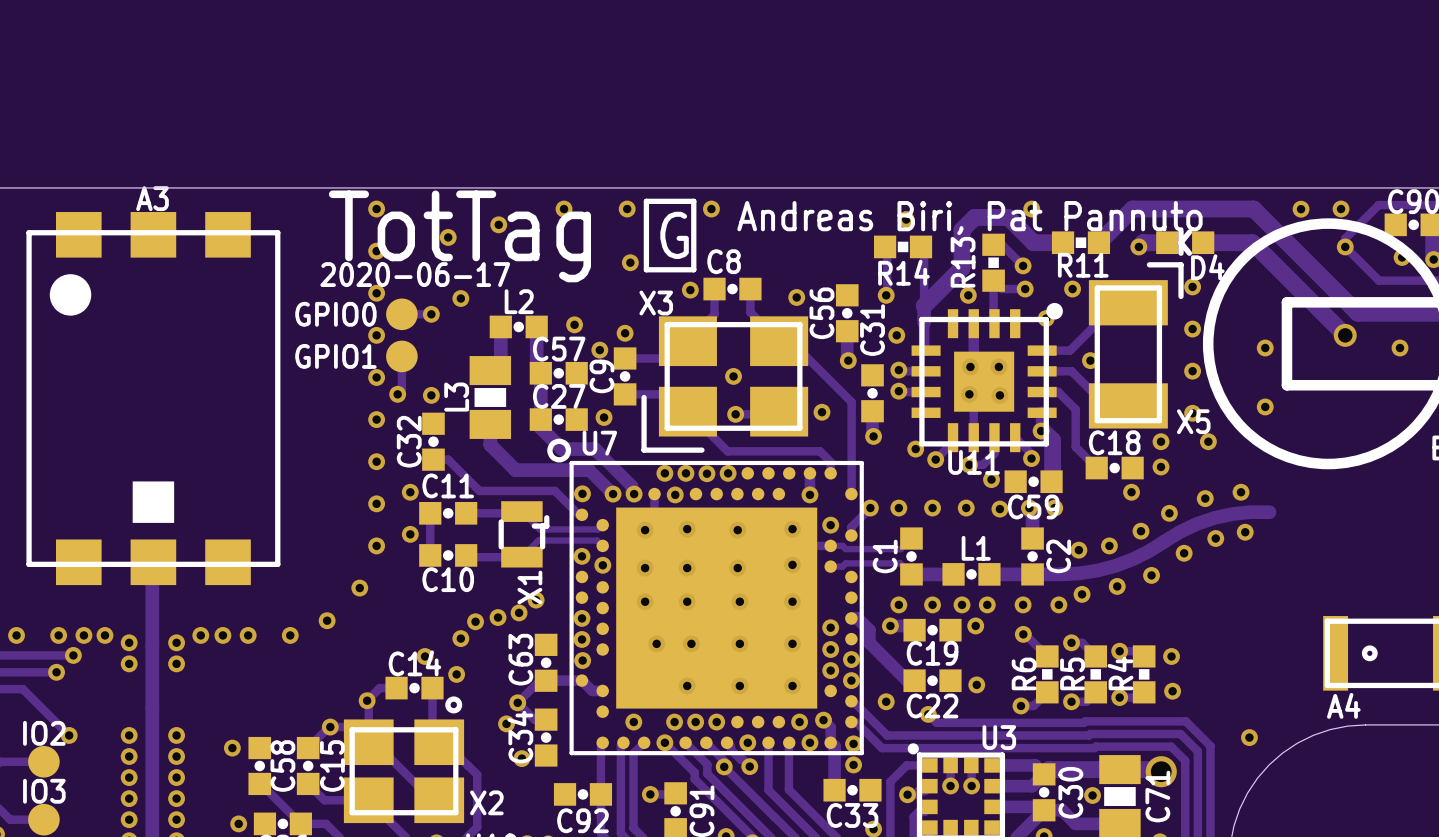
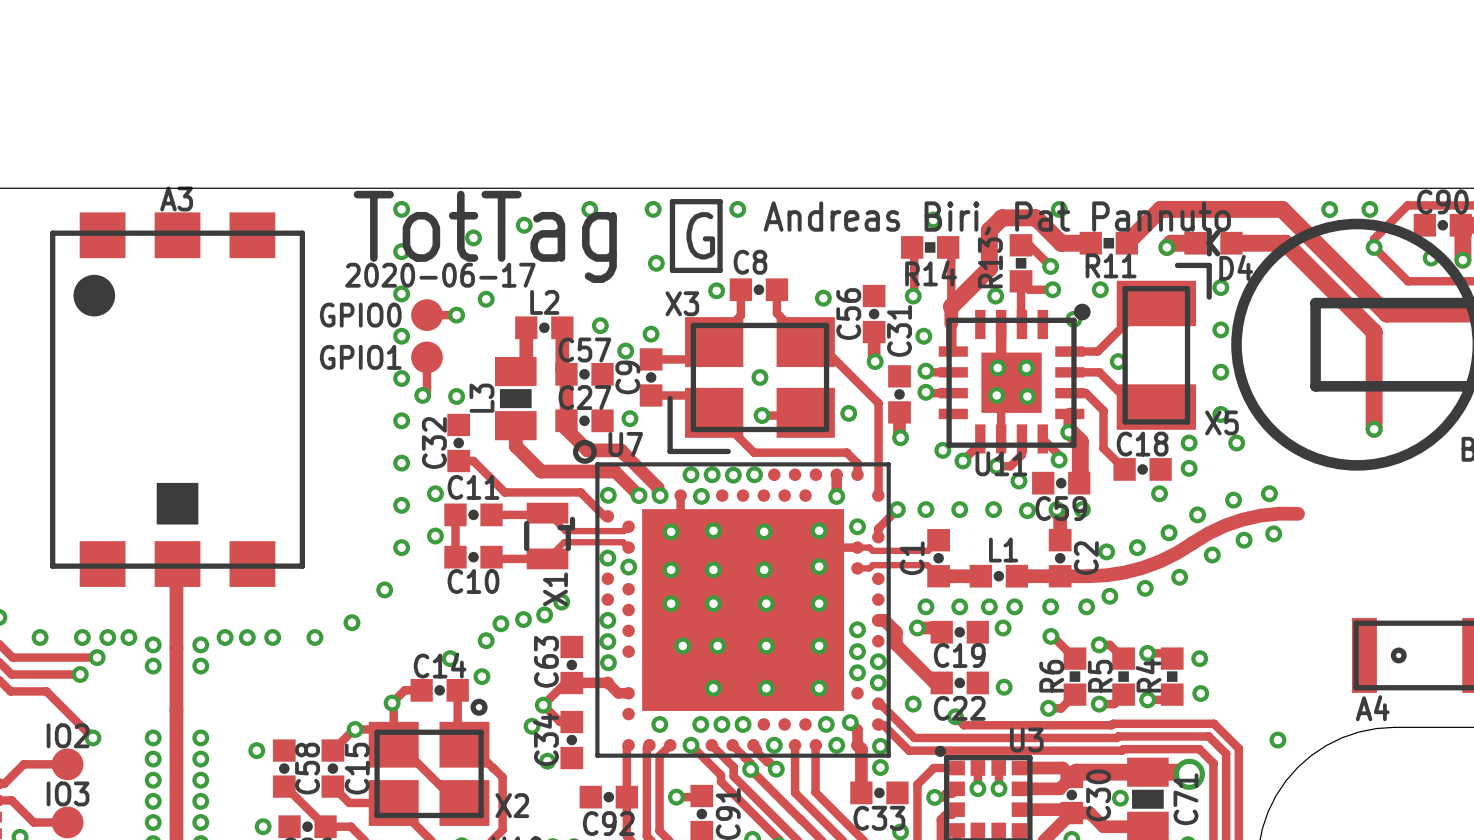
track: (1252, 242) (1345, 335) -> (1281, 243) (1285, 243) (1374, 332) (1374, 429)
via: (1345, 335) -> none
via: (1265, 348) -> none
via: (1400, 348) -> none
via: (1265, 406) -> none
via: none -> (1374, 429)

